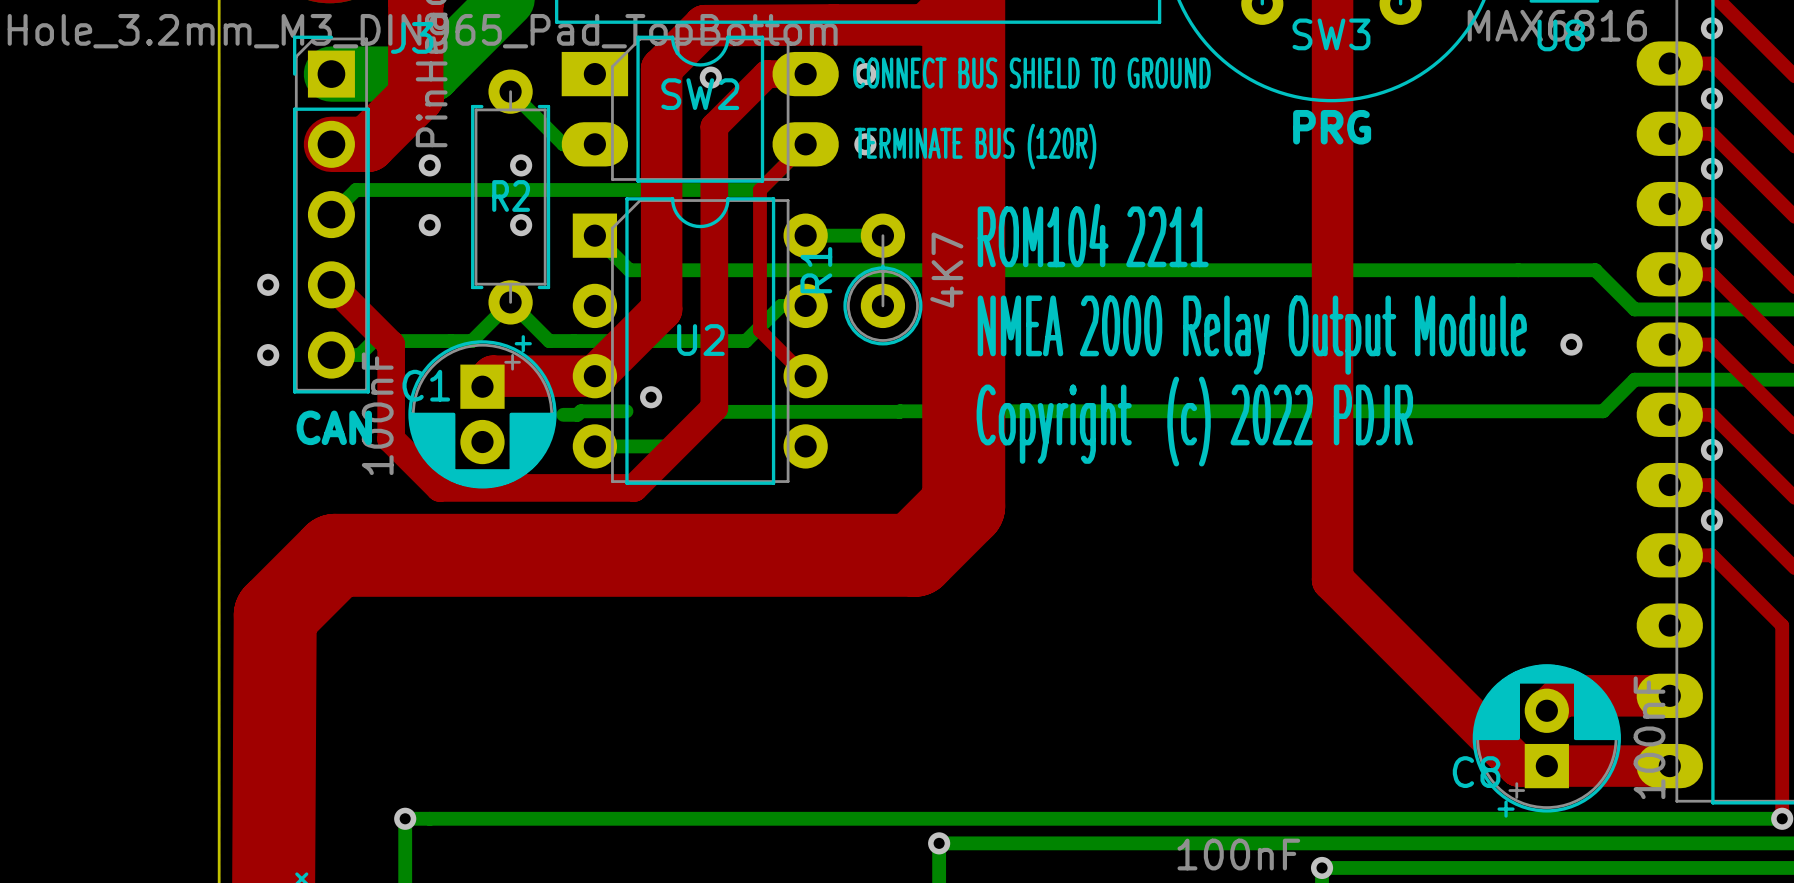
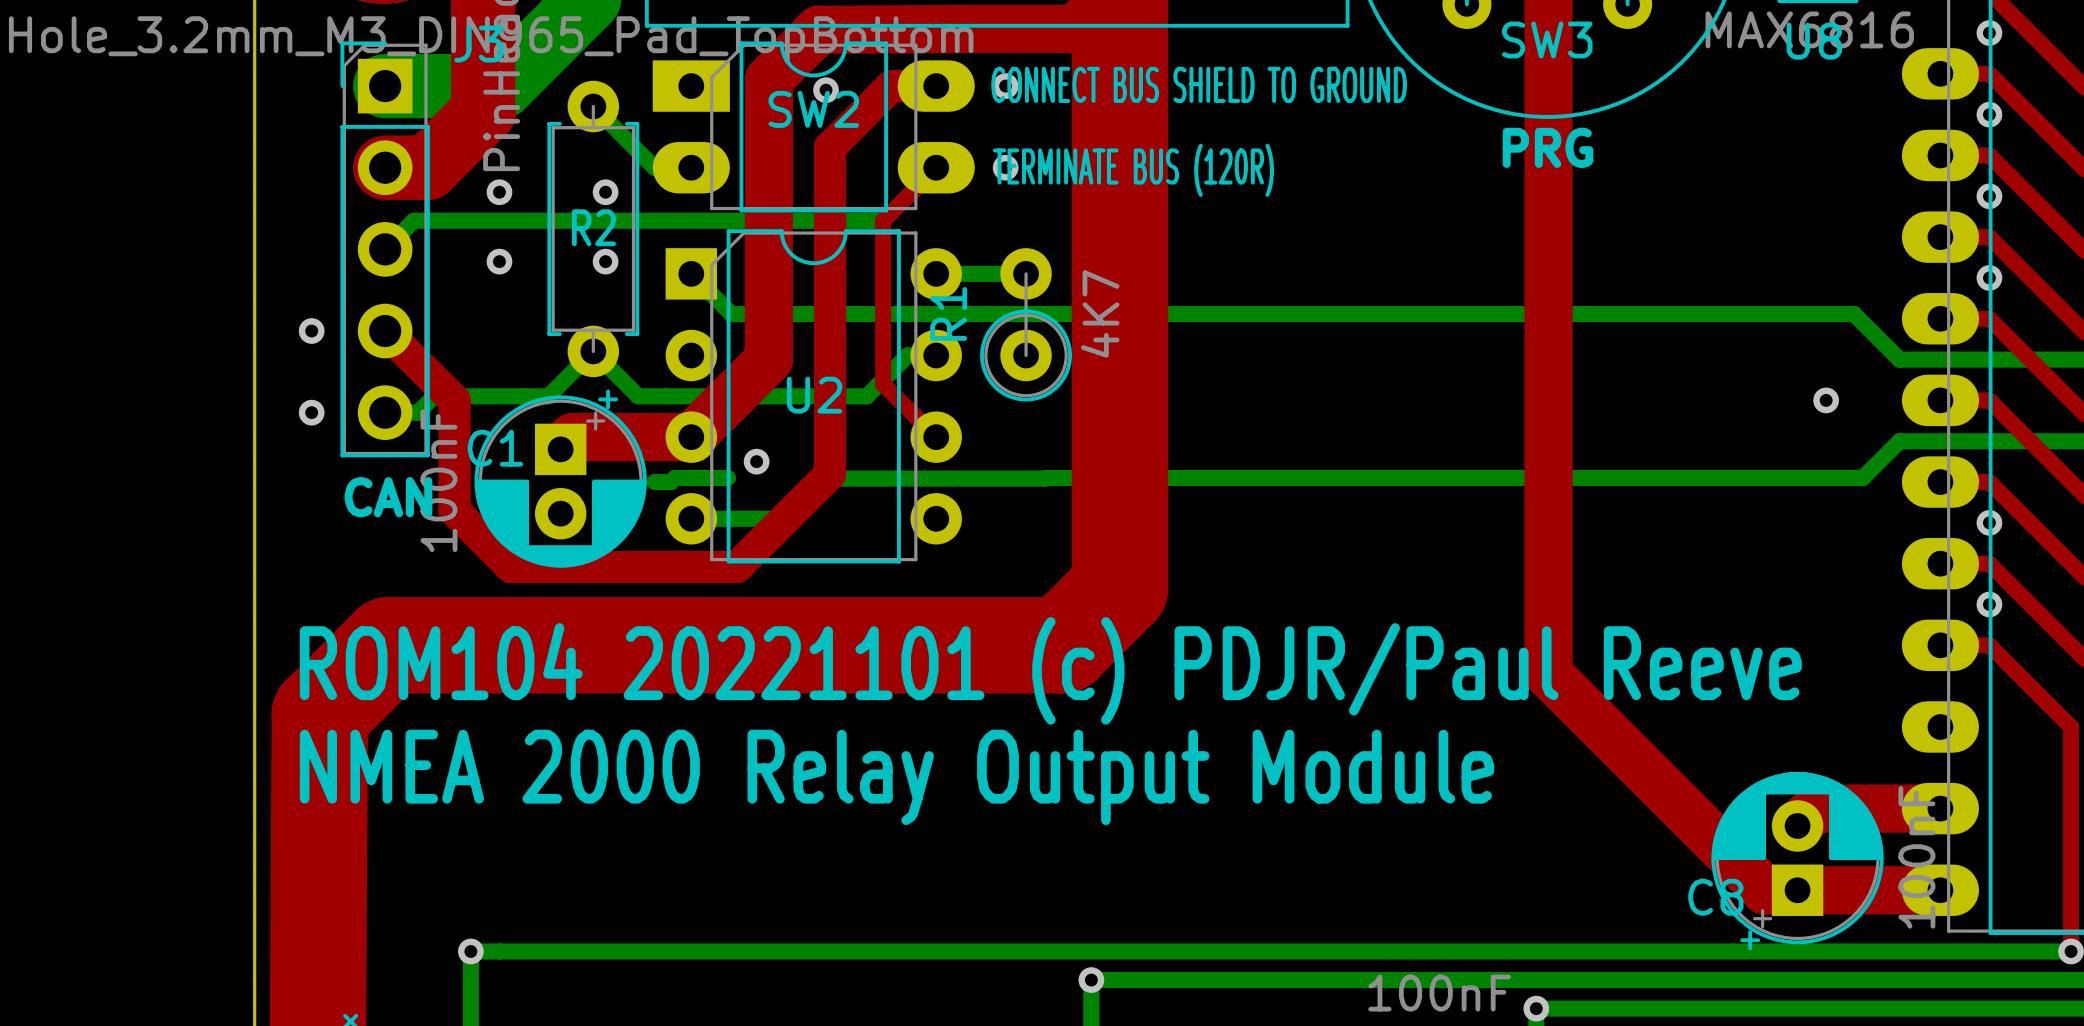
text: ROM104 2211 (1093, 235) -> none
text: NMEA 2000 Relay Output Module (1252, 335) -> none
text: Copyright (c) 2022 PDJR (1194, 421) -> none
text: none -> ROM104 20221101 (c) PDJR/Paul Reeve (1050, 670)
text: none -> NMEA 2000 Relay Output Module (897, 777)

